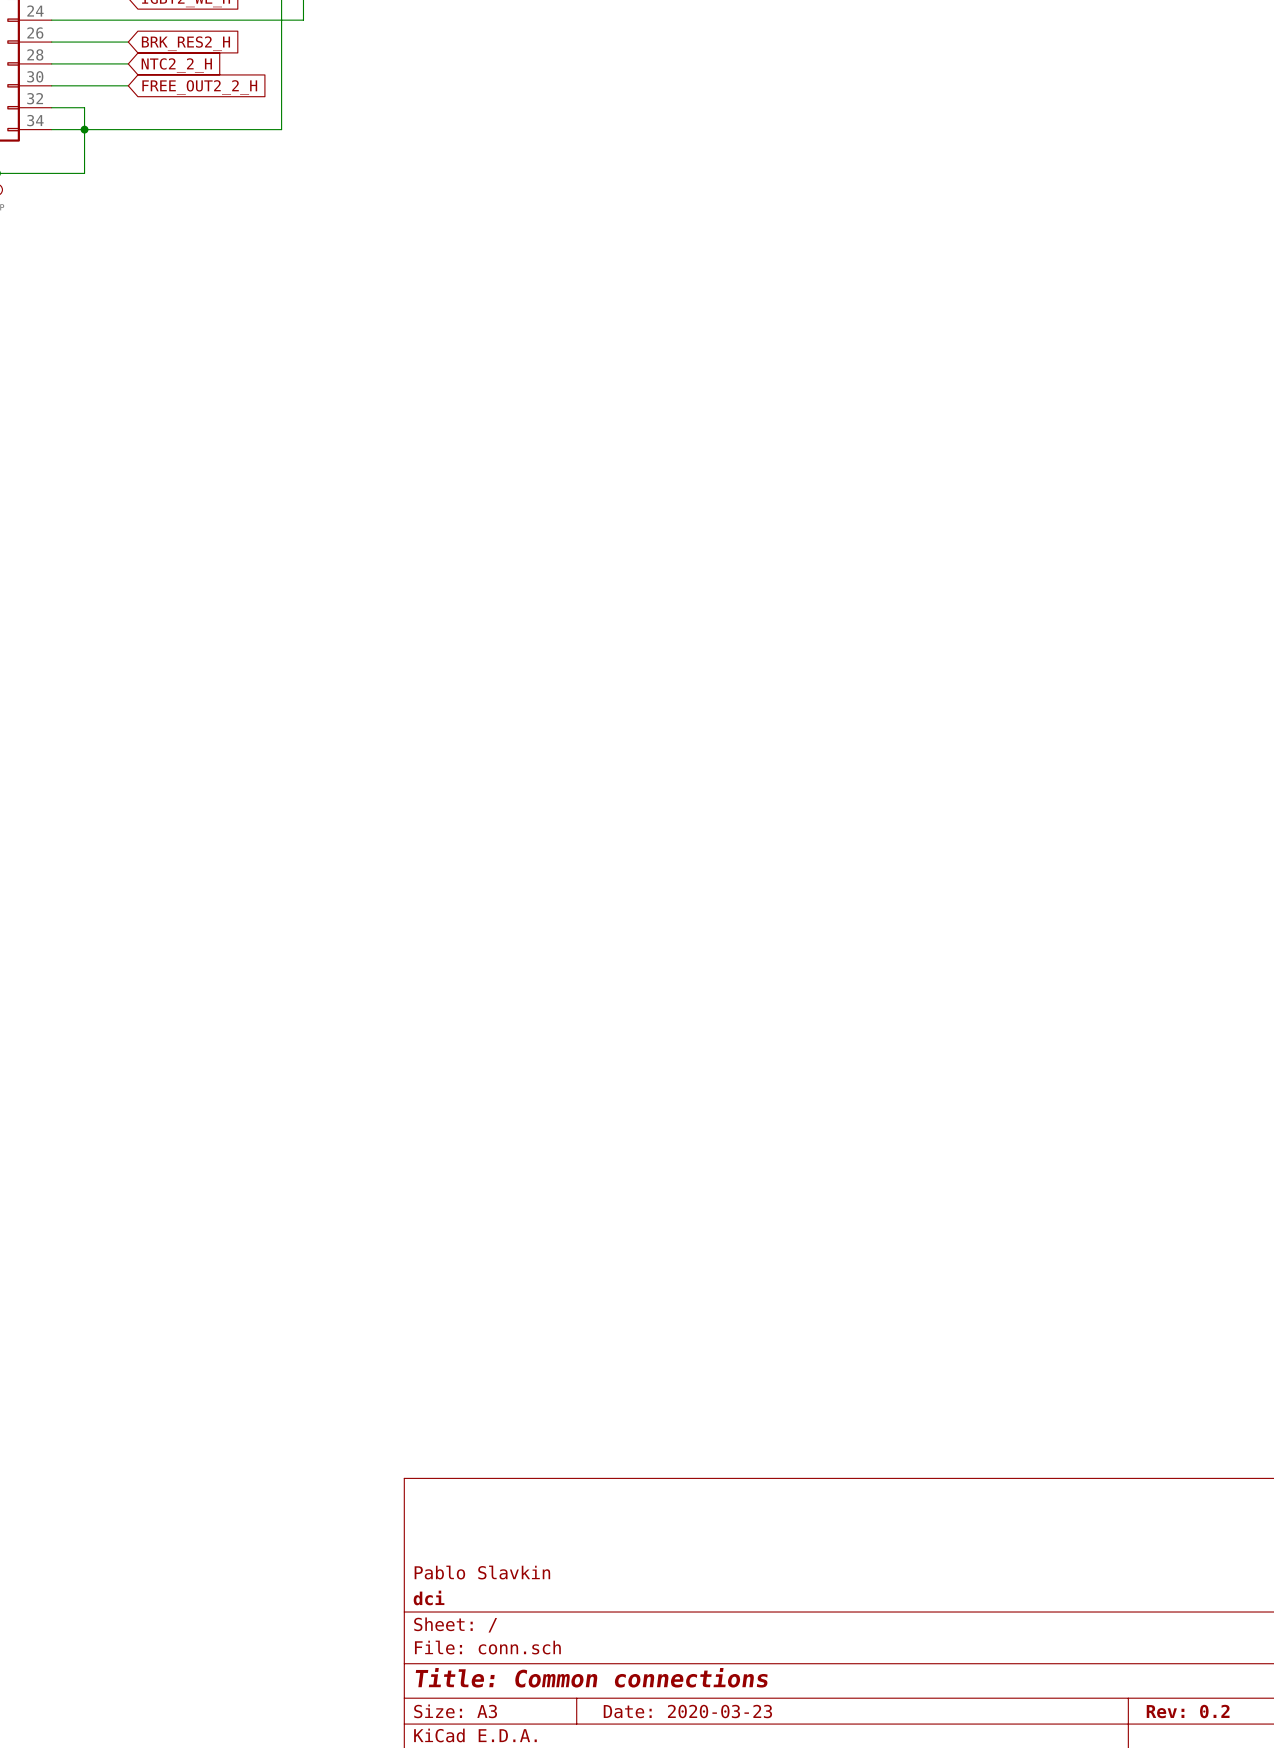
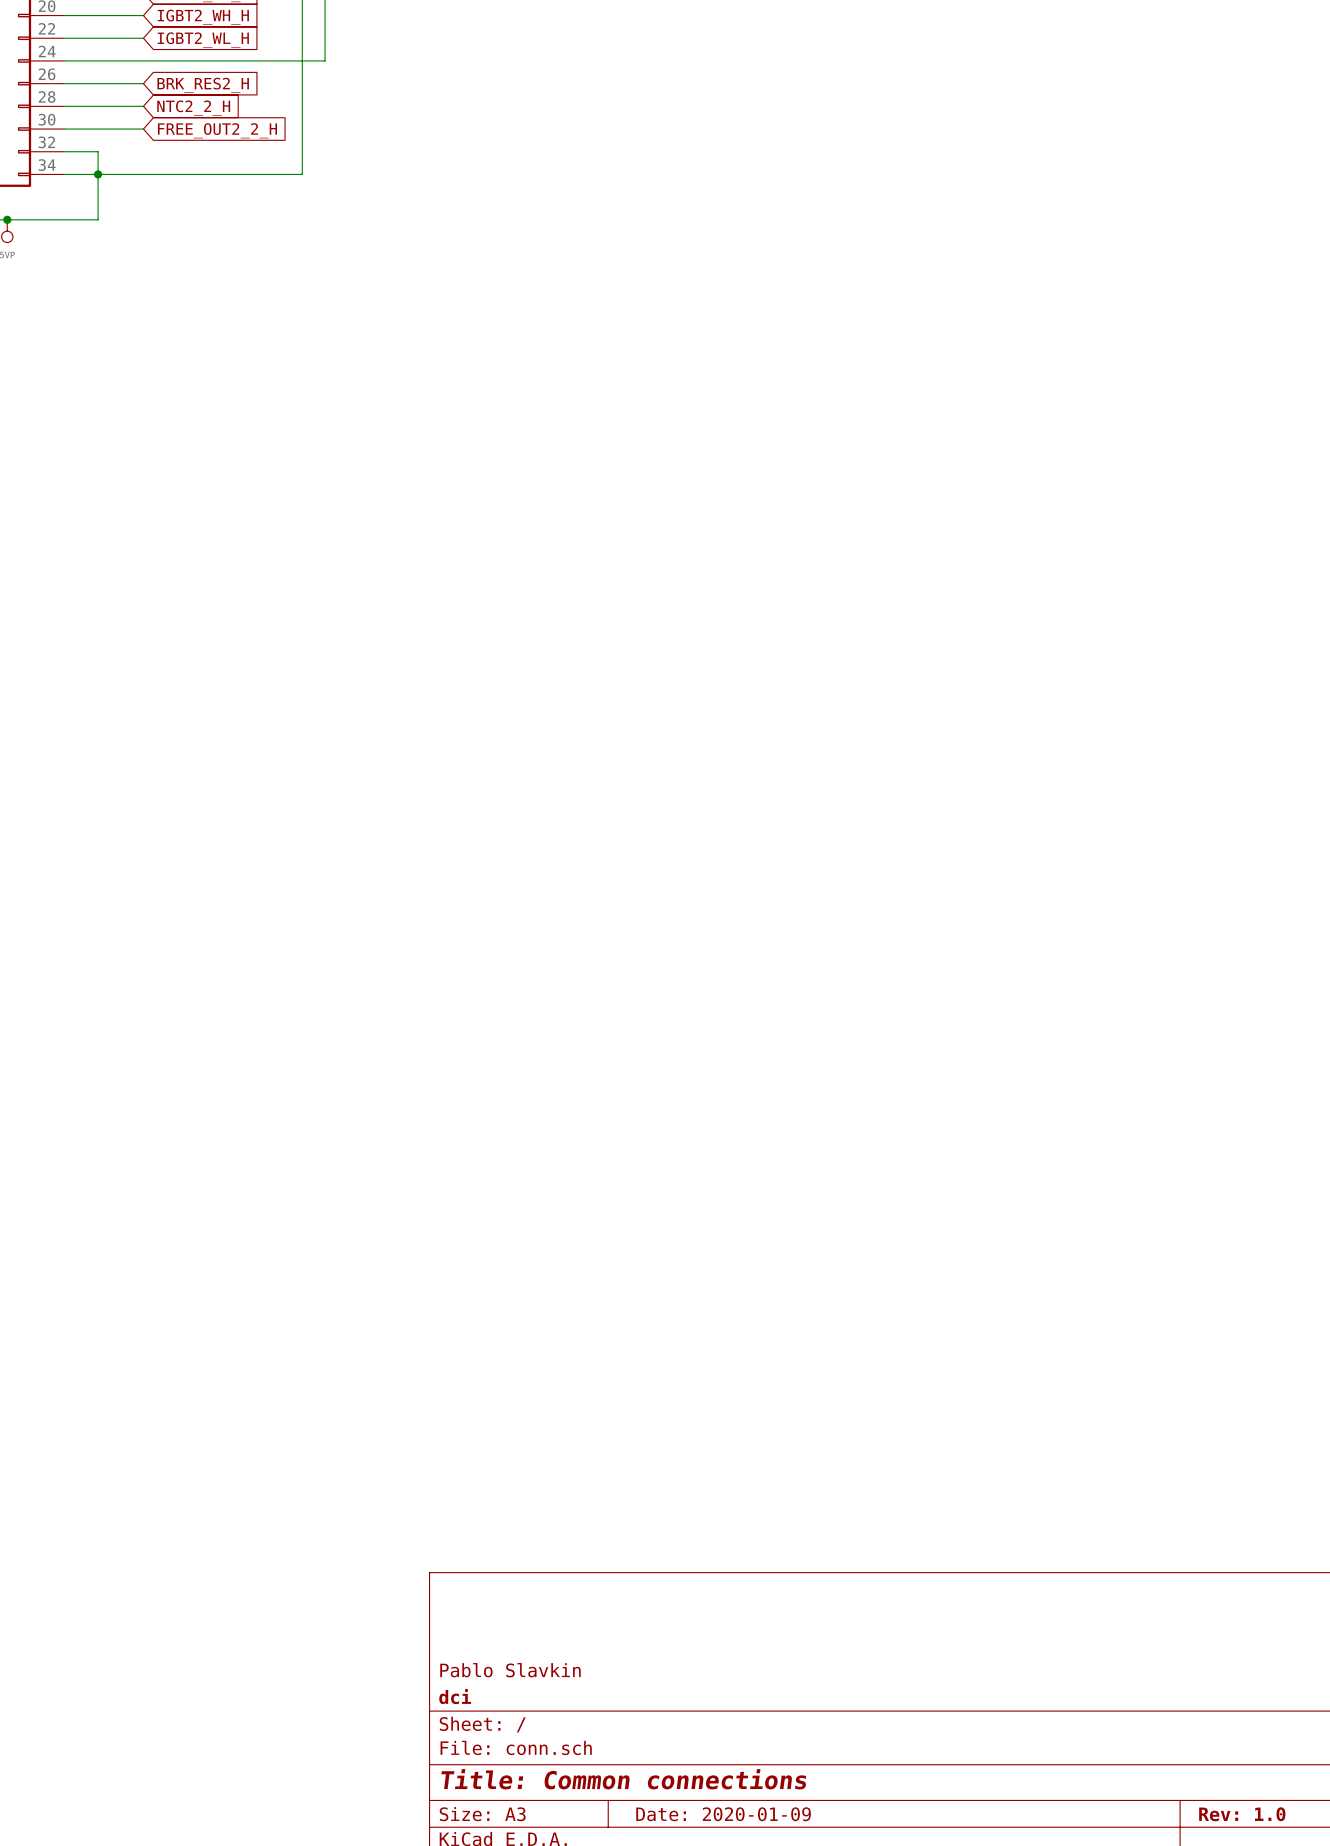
title block: Date: 2020-03-23 (687, 1711) -> Date: 2020-01-09 (723, 1814)
title block: Rev: 0.2 (1188, 1711) -> Rev: 1.0 (1242, 1814)

